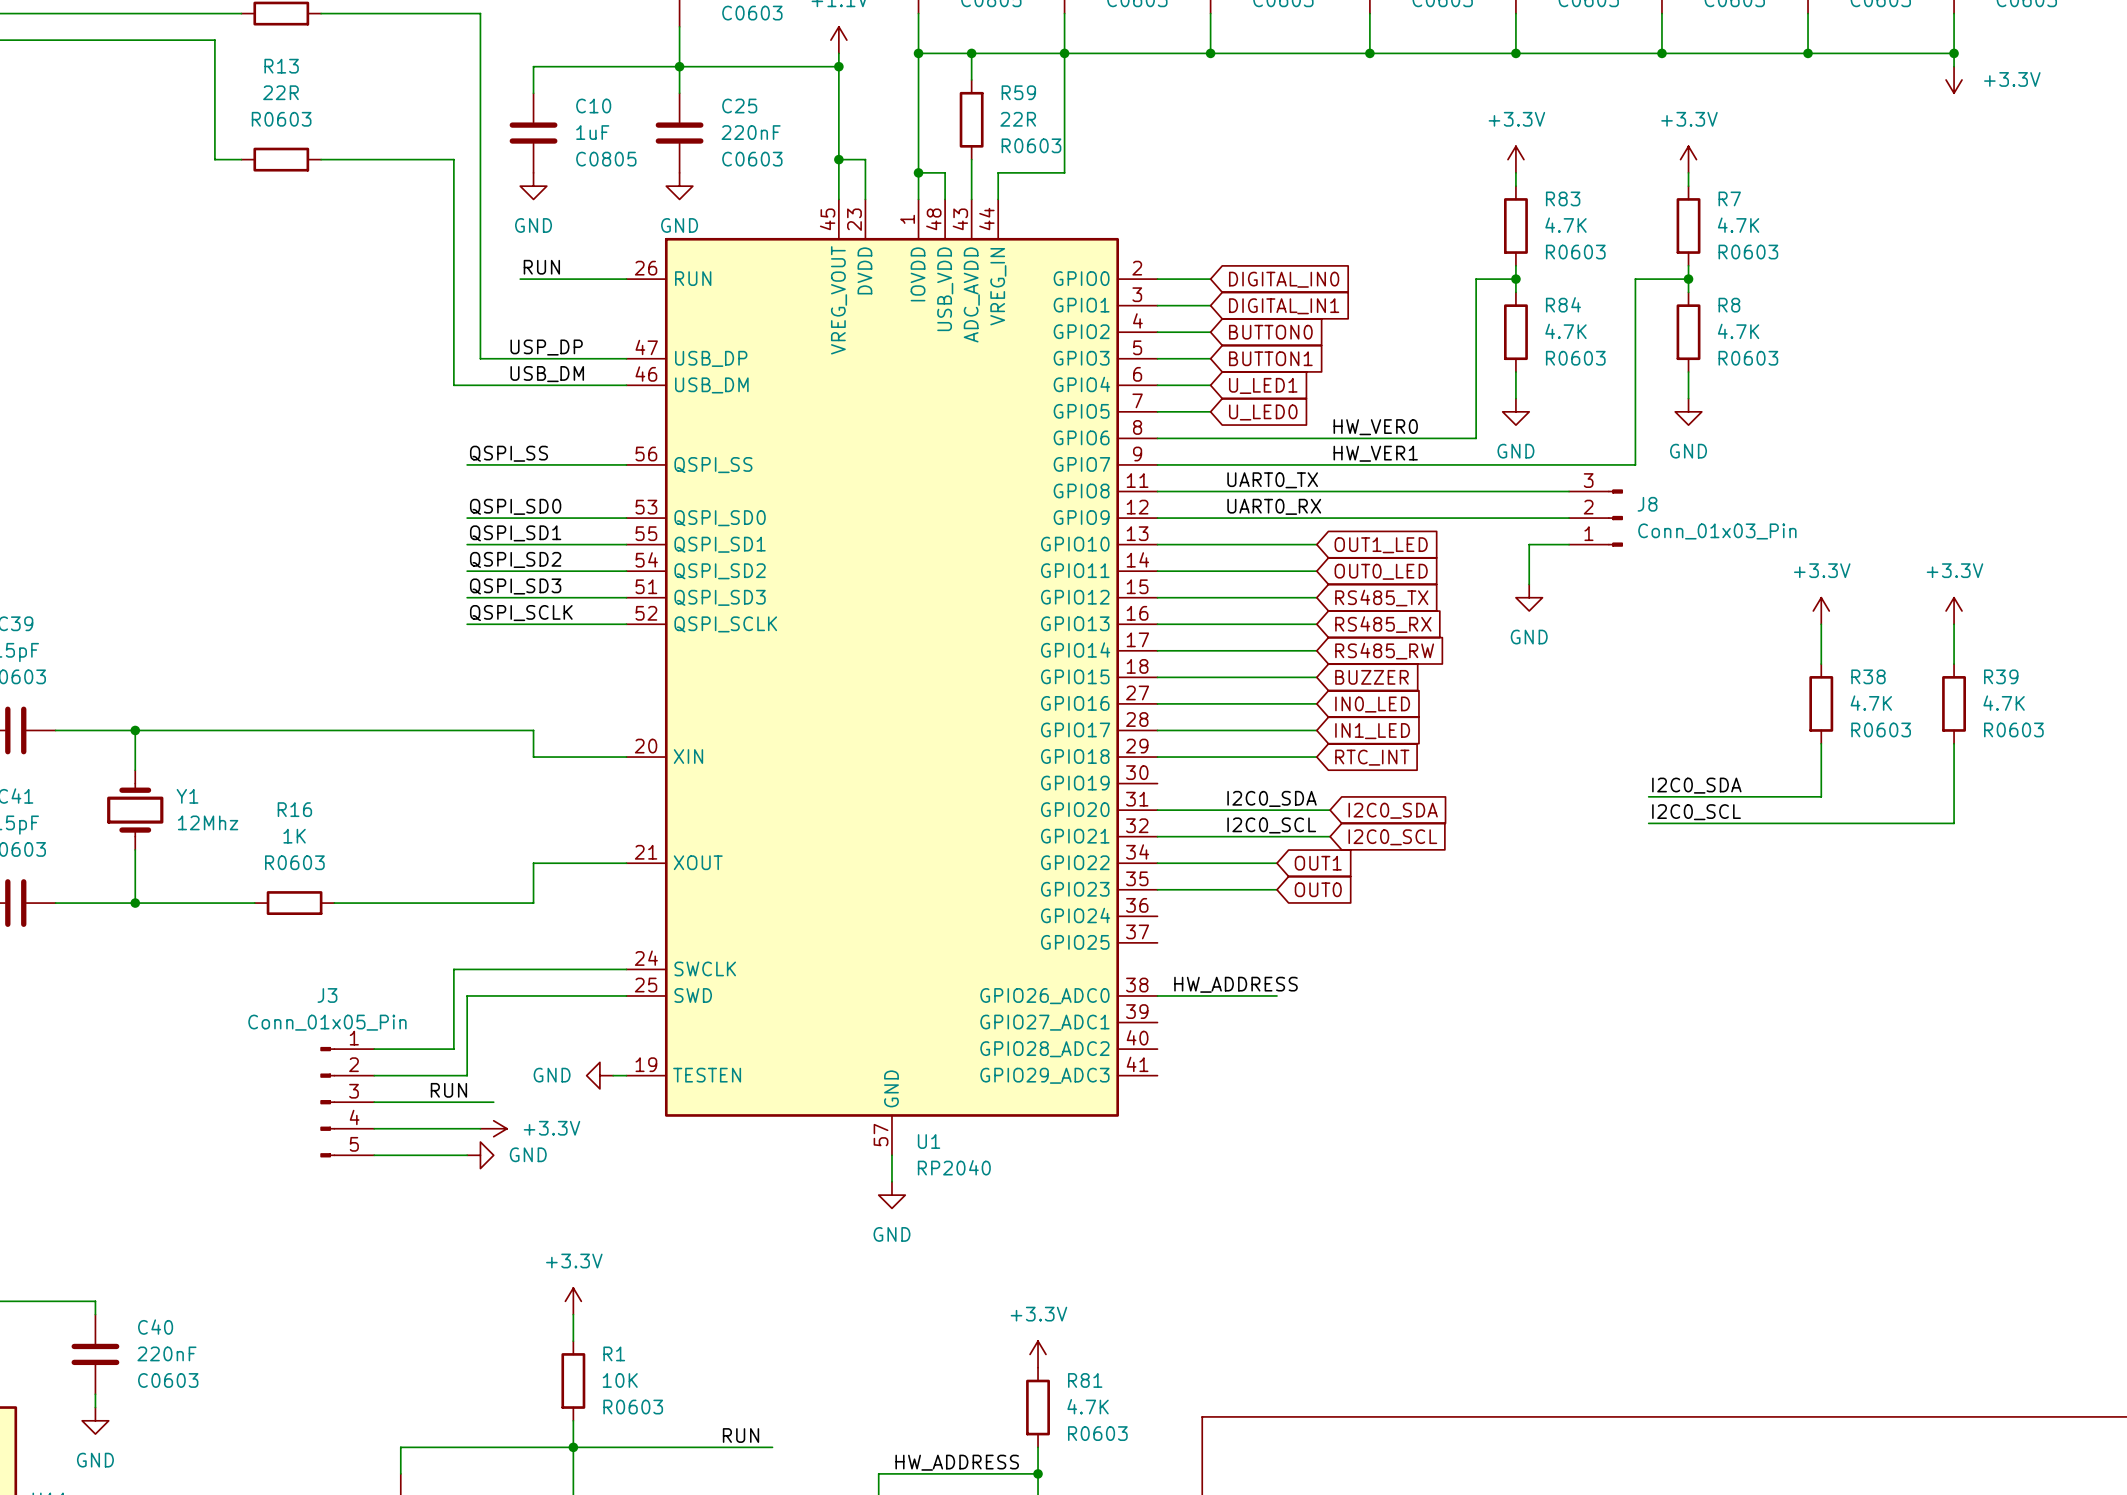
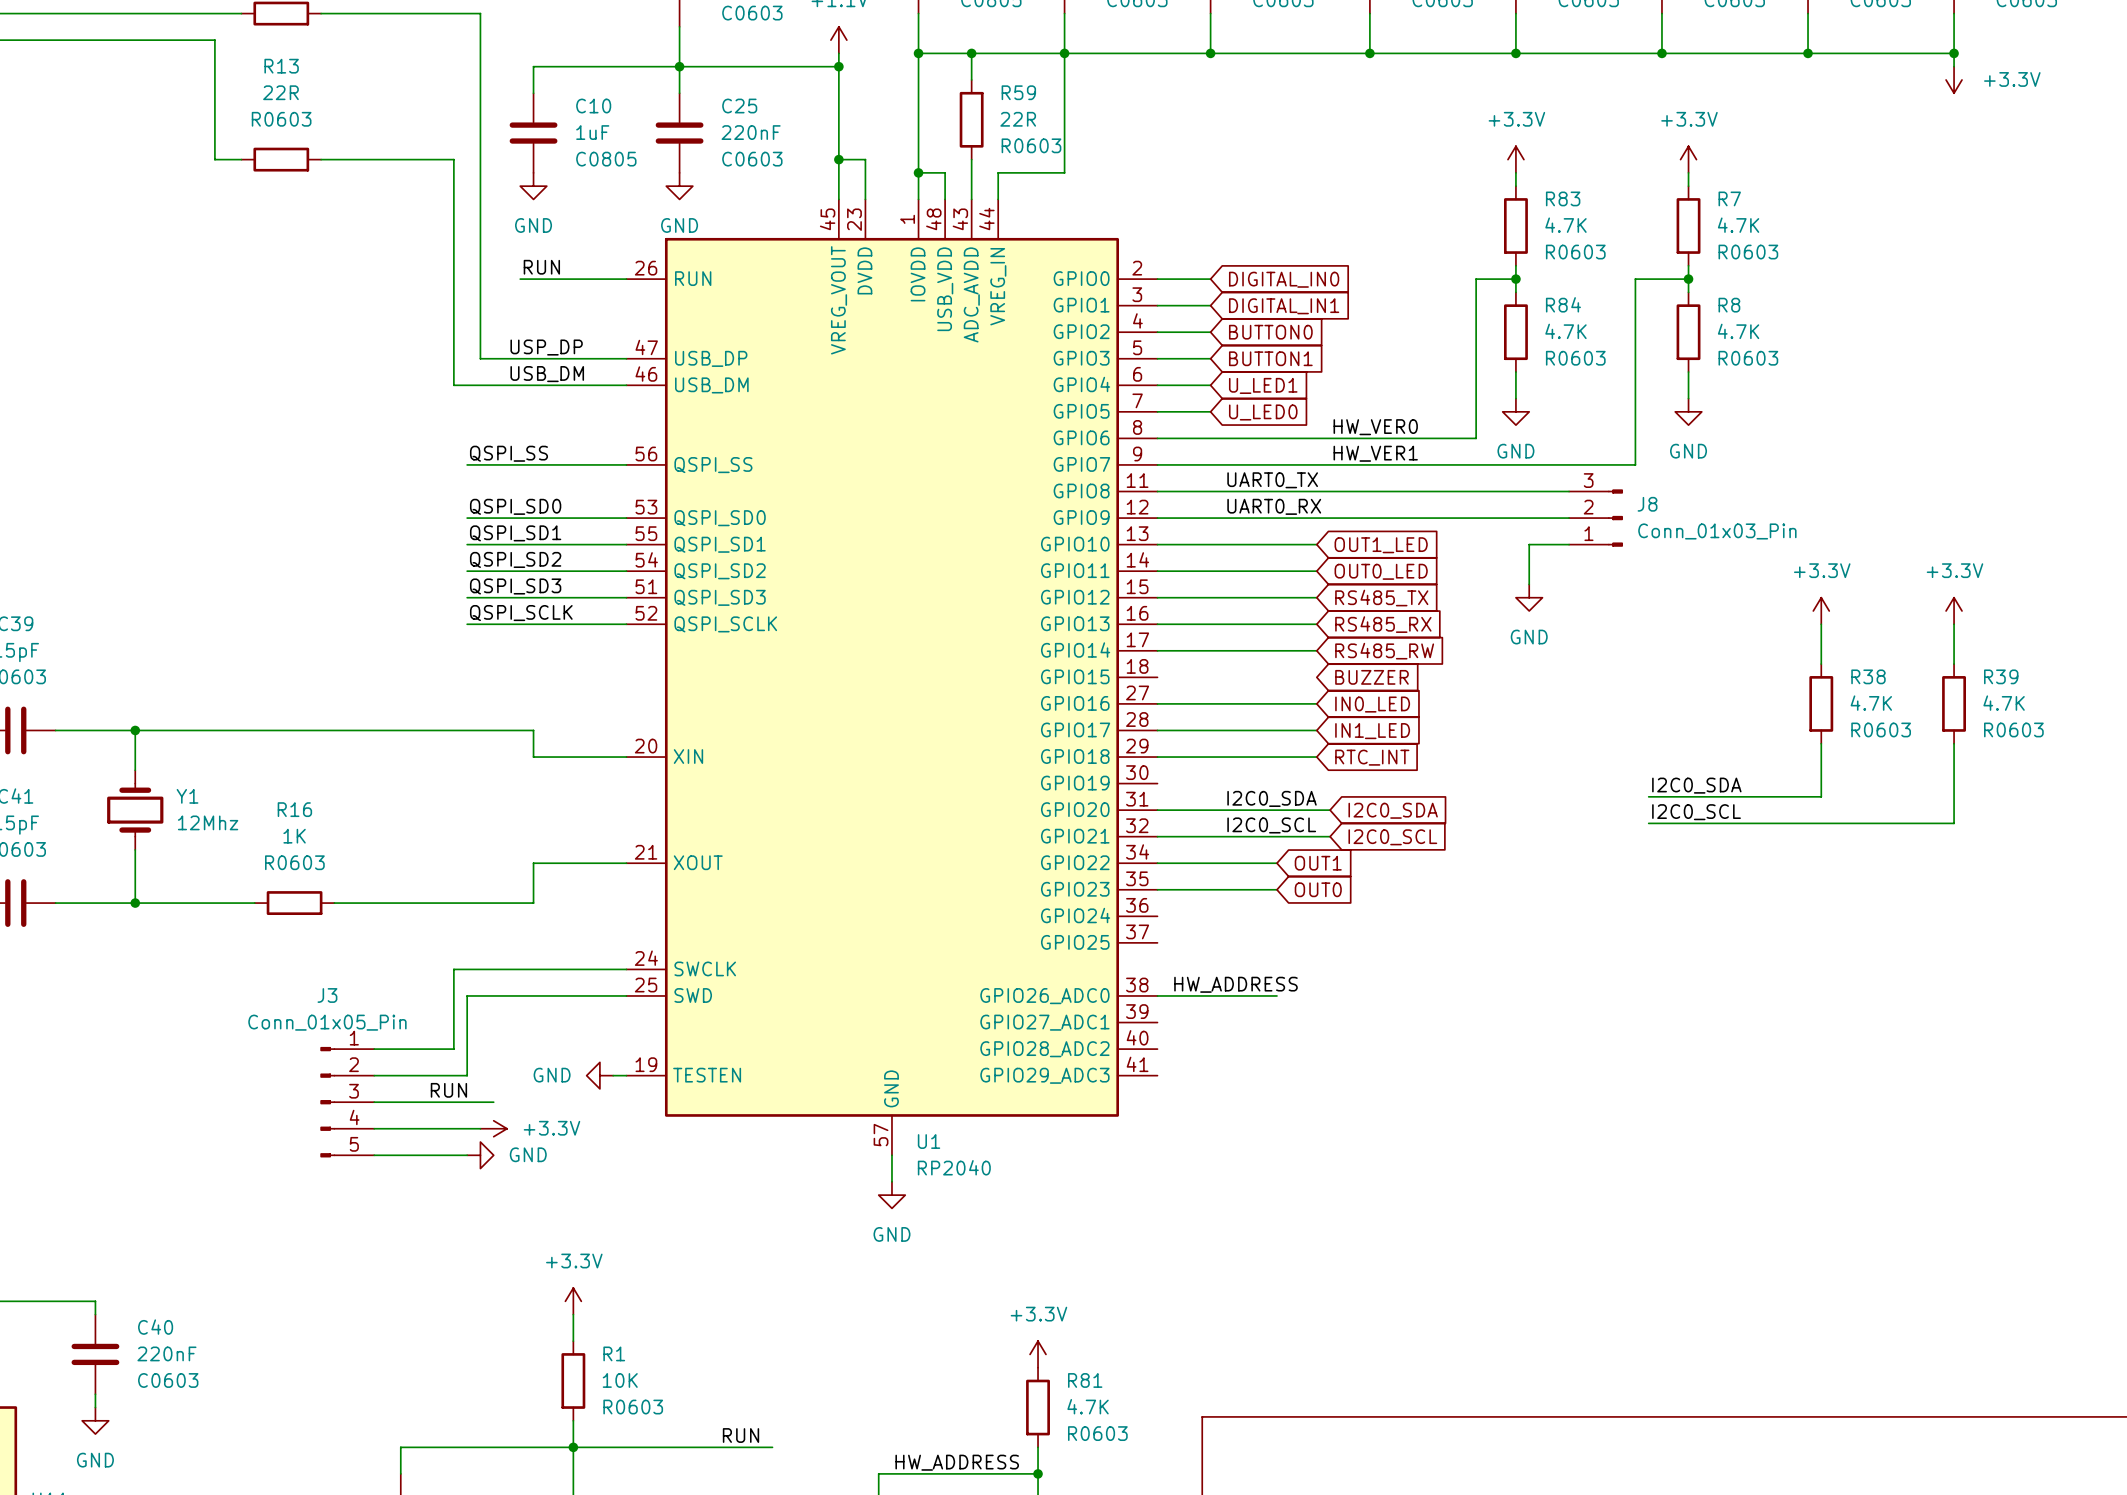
wire: (1157, 677) (1316, 677) -> none

